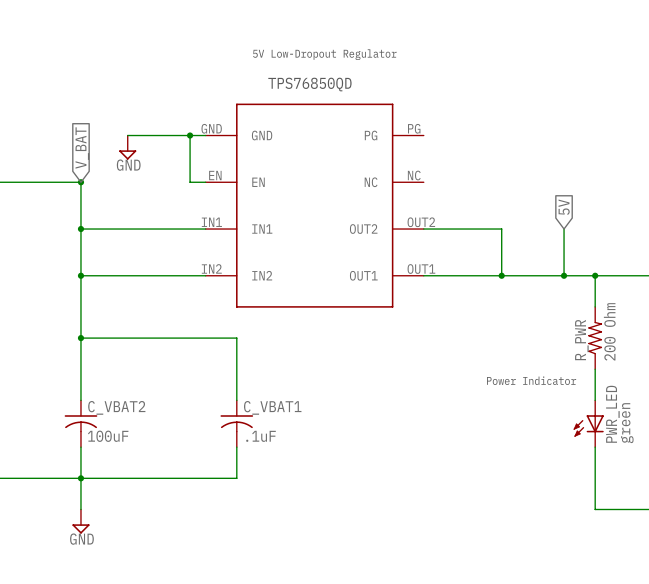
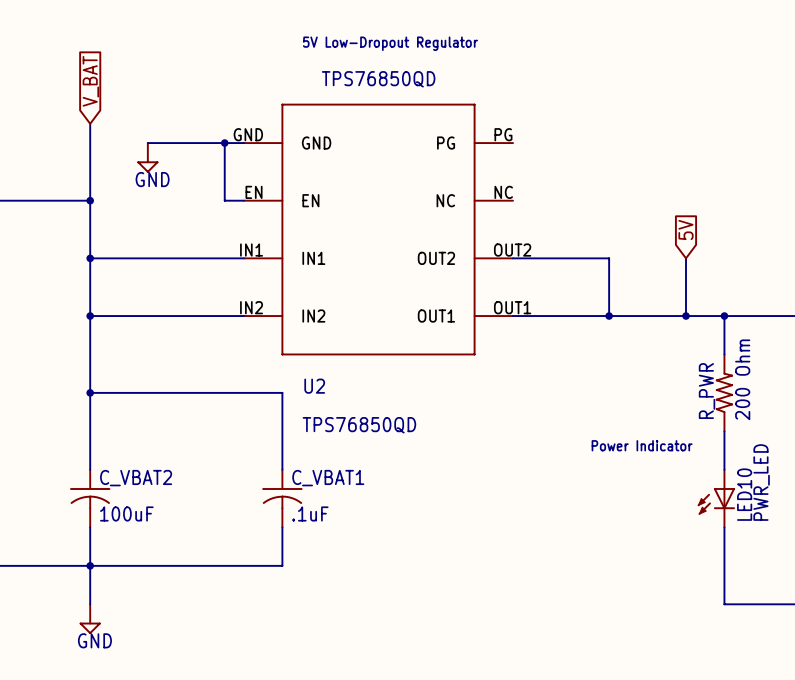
wire: none -> (90, 123) (90, 200)
global label position: V_BAT (82, 148) -> V_BAT (90, 81)
U2 name: none -> U2 (314, 386)
U2 value: none -> TPS76850QD (359, 425)
PWR_LED name: PWR_LED (612, 414) -> LED10 (744, 494)
PWR_LED value: green (627, 423) -> PWR_LED (761, 482)

